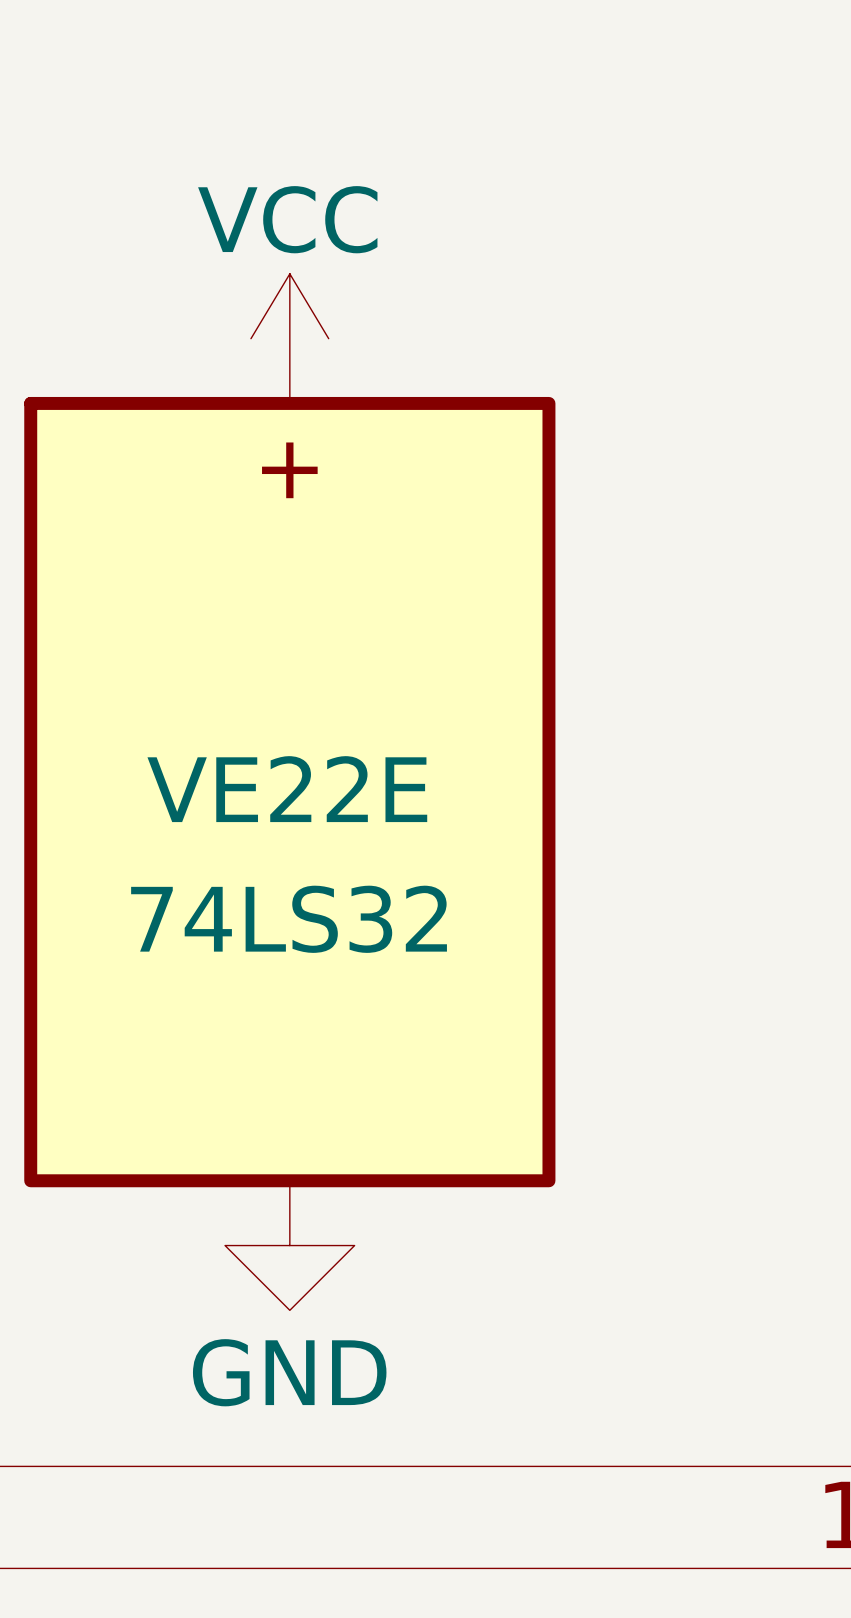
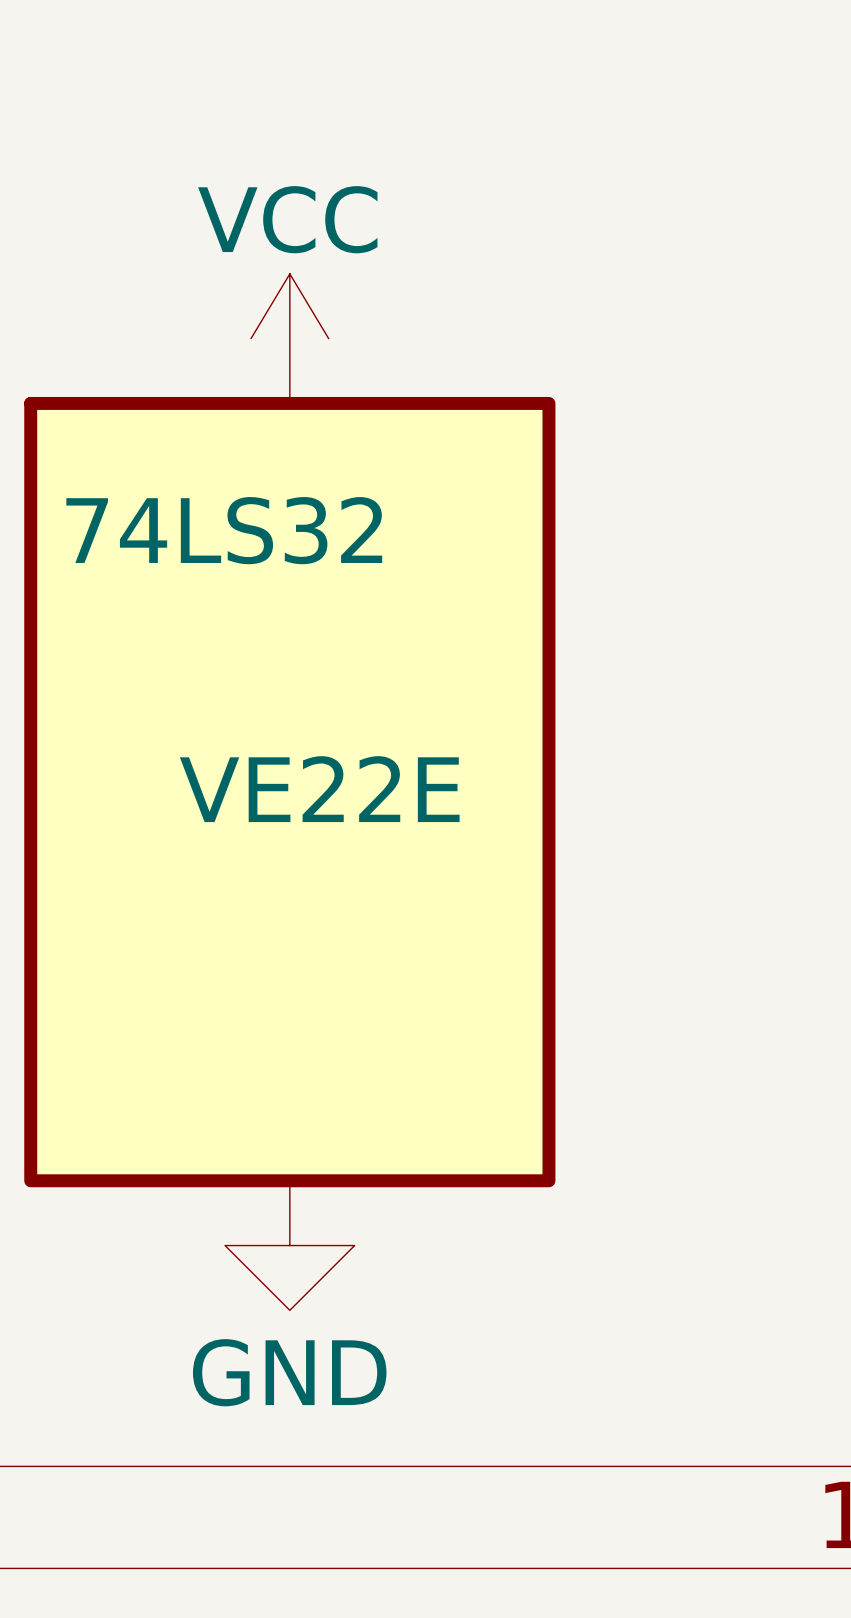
VE22E text: + (289, 470) -> none
VE22E name position: VE22E (287, 789) -> VE22E (319, 789)
VE22E value position: 74LS32 (289, 919) -> 74LS32 (224, 530)

